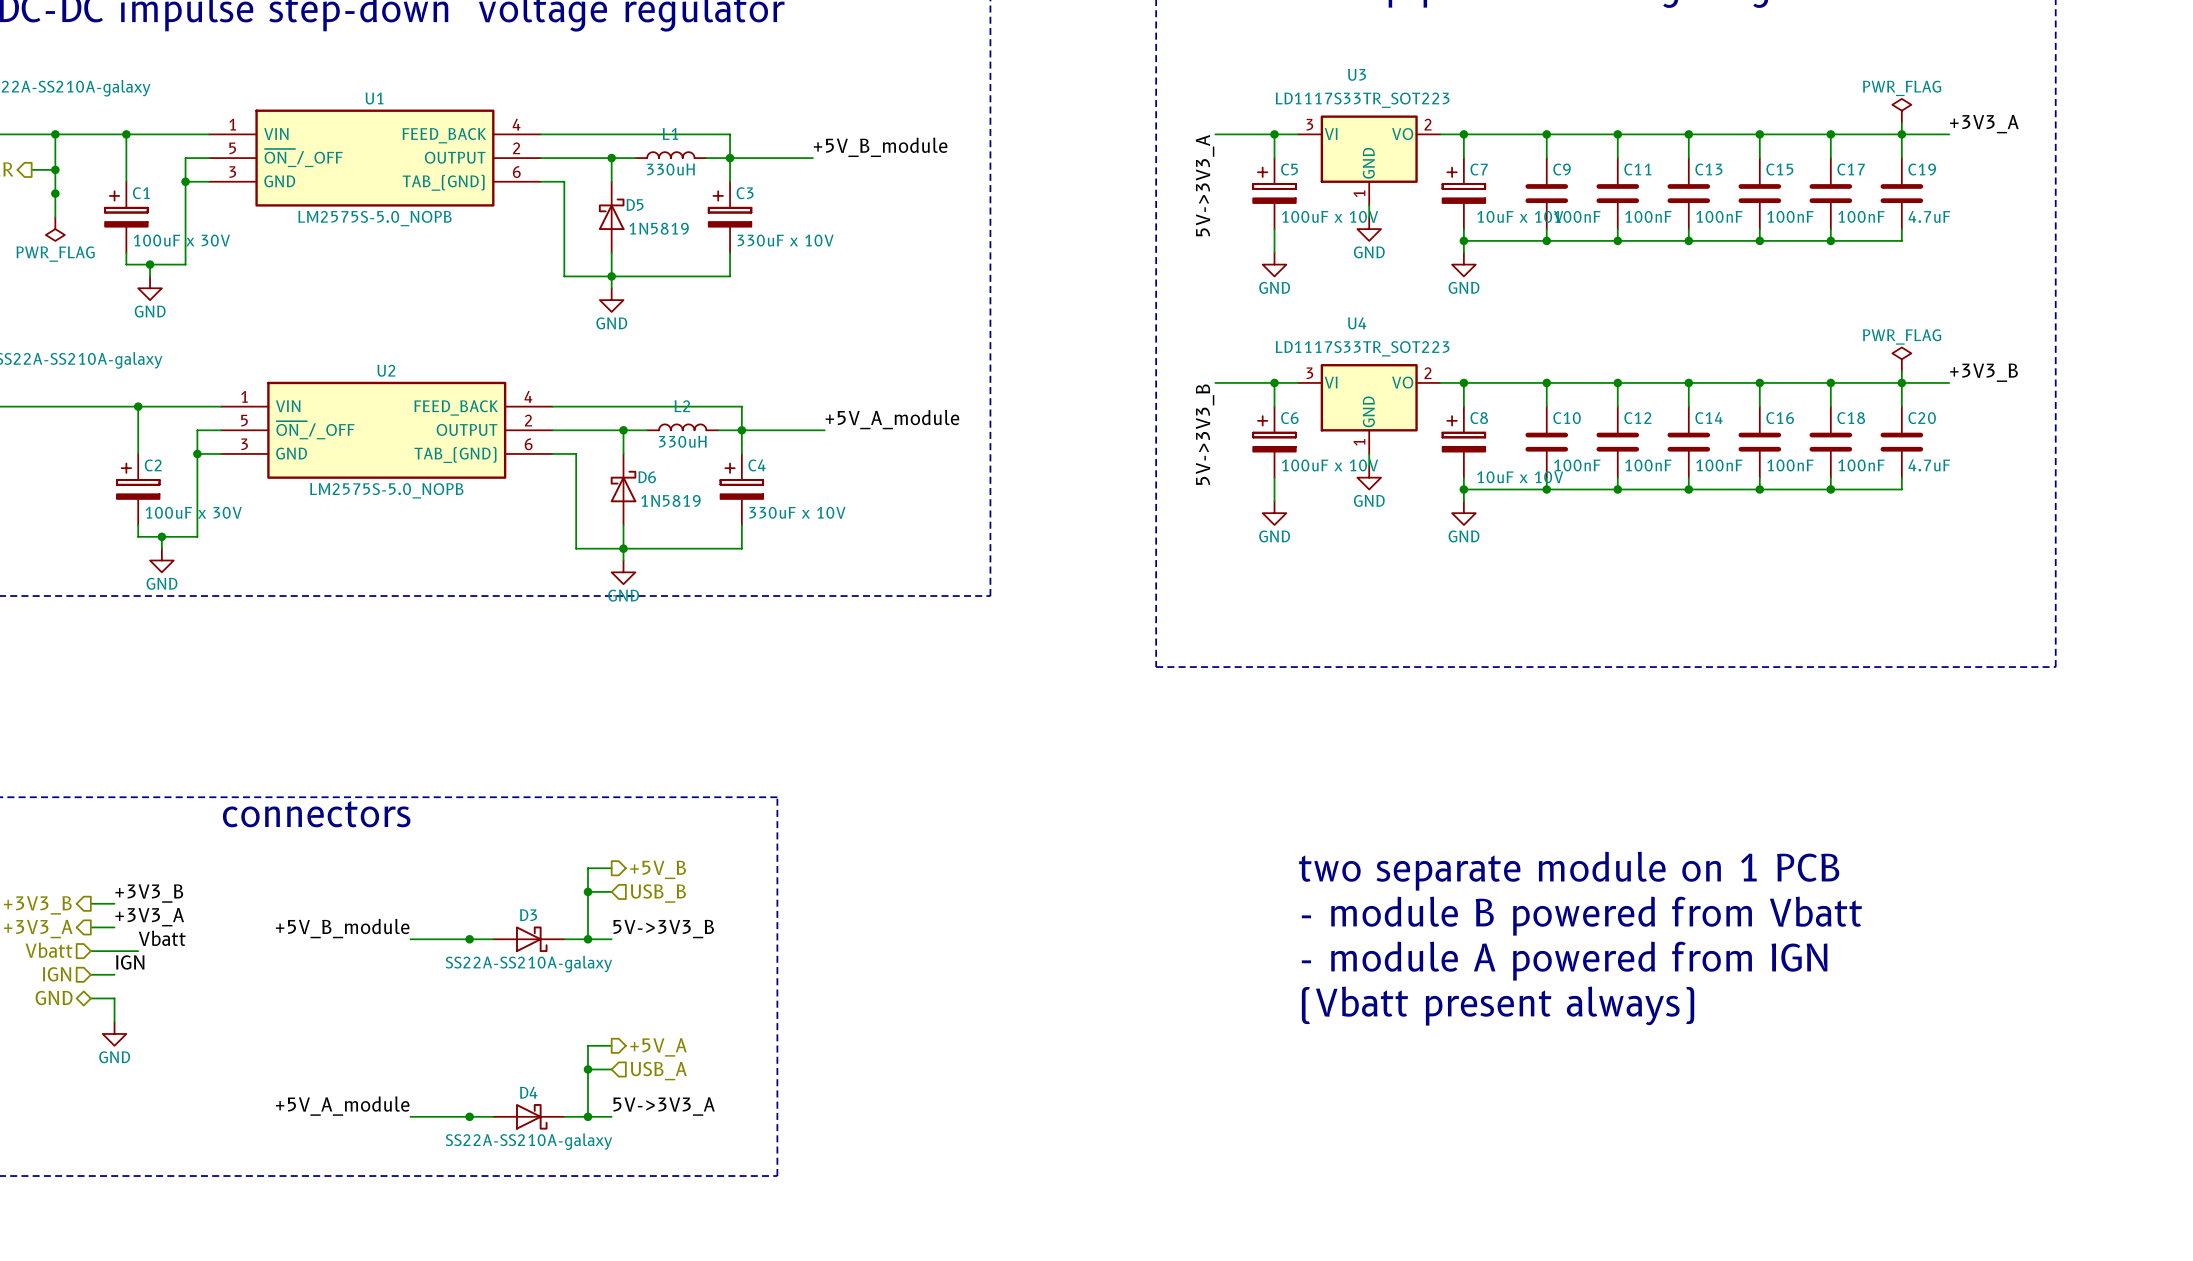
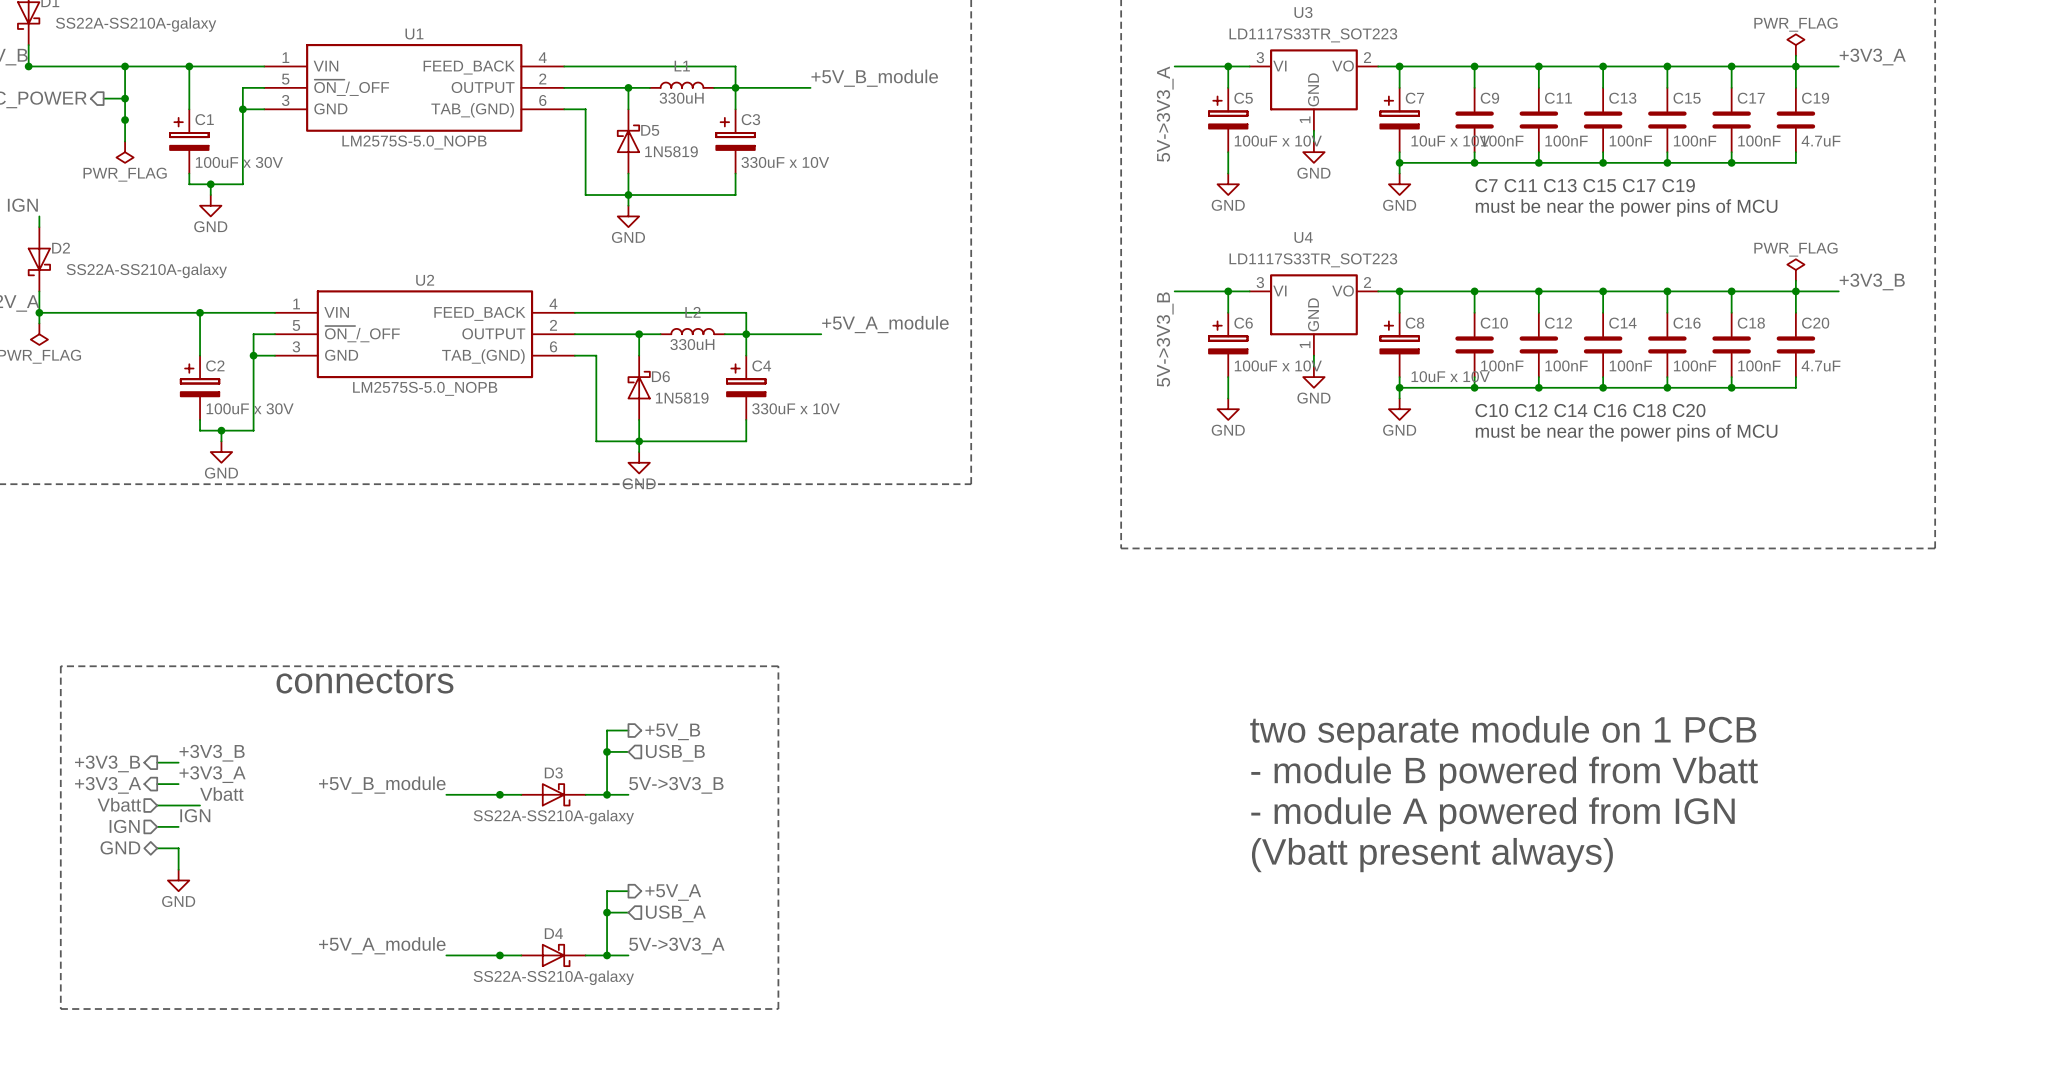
text: none -> C7 C11 C13 C15 C17 C19 (1585, 185)
text: none -> must be near the power pins of MCU (1626, 207)
text: none -> C10 C12 C14 C16 C18 C20 (1590, 410)
text: none -> must be near the power pins of MCU (1626, 432)

